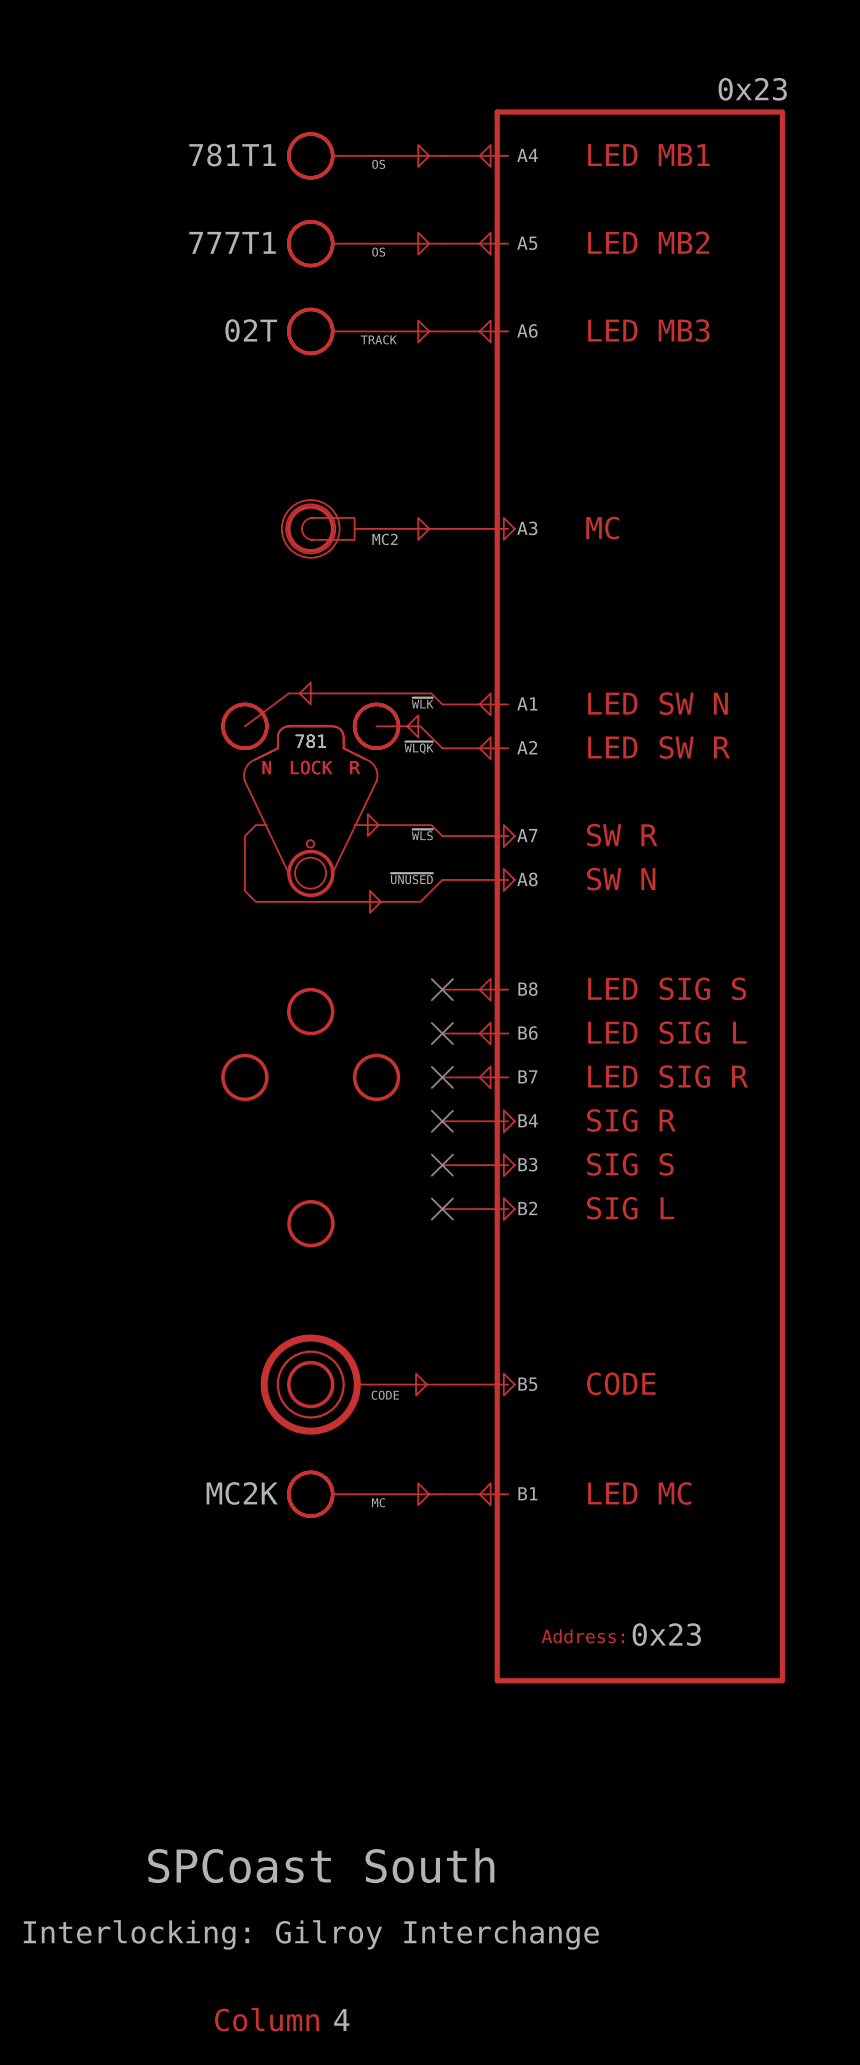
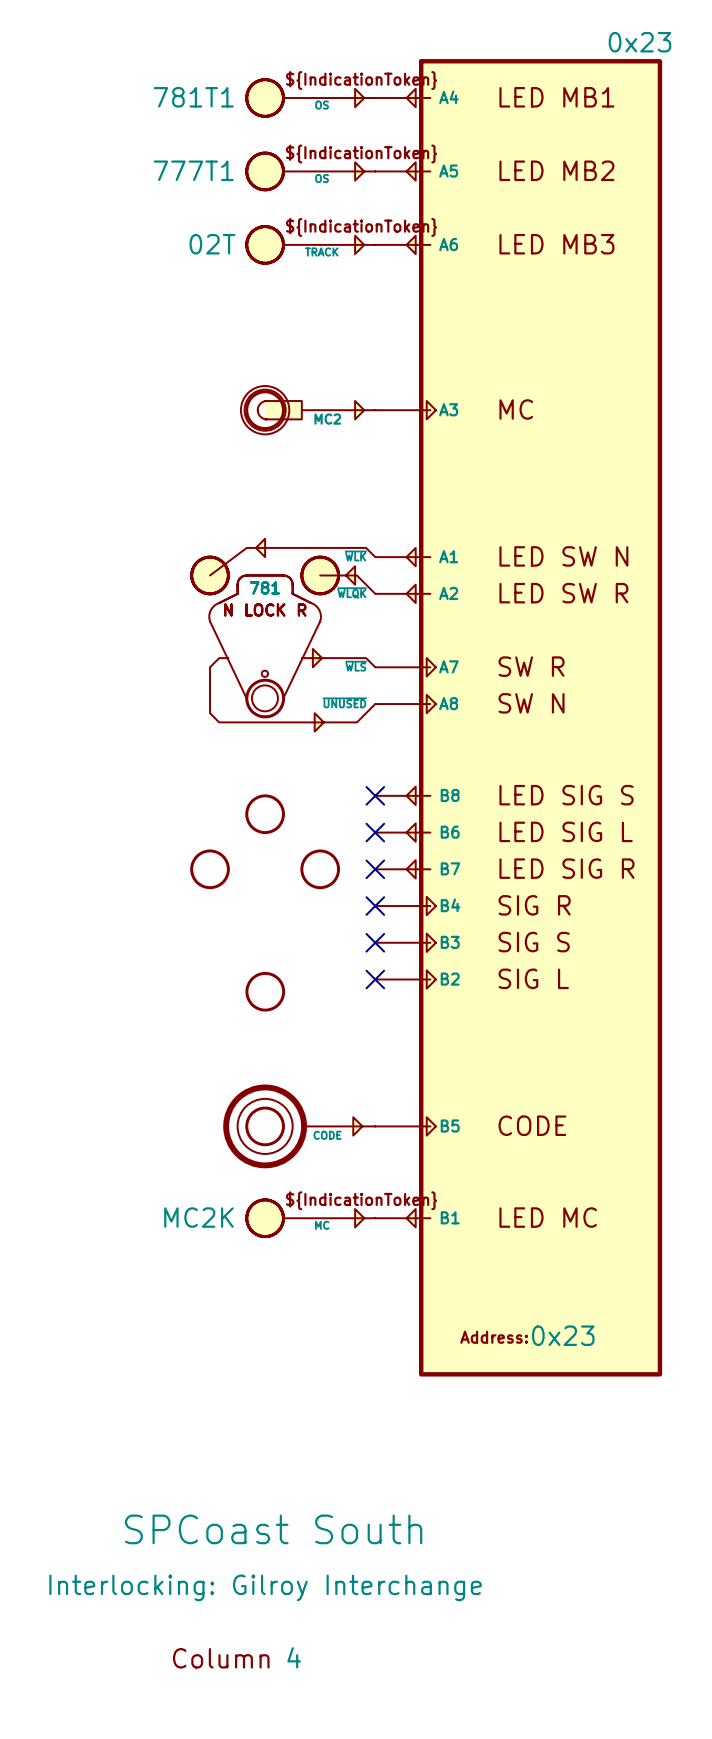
part symbol: [442, 109, 786, 1684] -> [375, 59, 663, 1377]
part text: none -> ${IndicationToken} (361, 80)
part text: none -> ${IndicationToken} (361, 153)
part text: none -> ${IndicationToken} (361, 227)
part text: none -> ${IndicationToken} (361, 1200)

